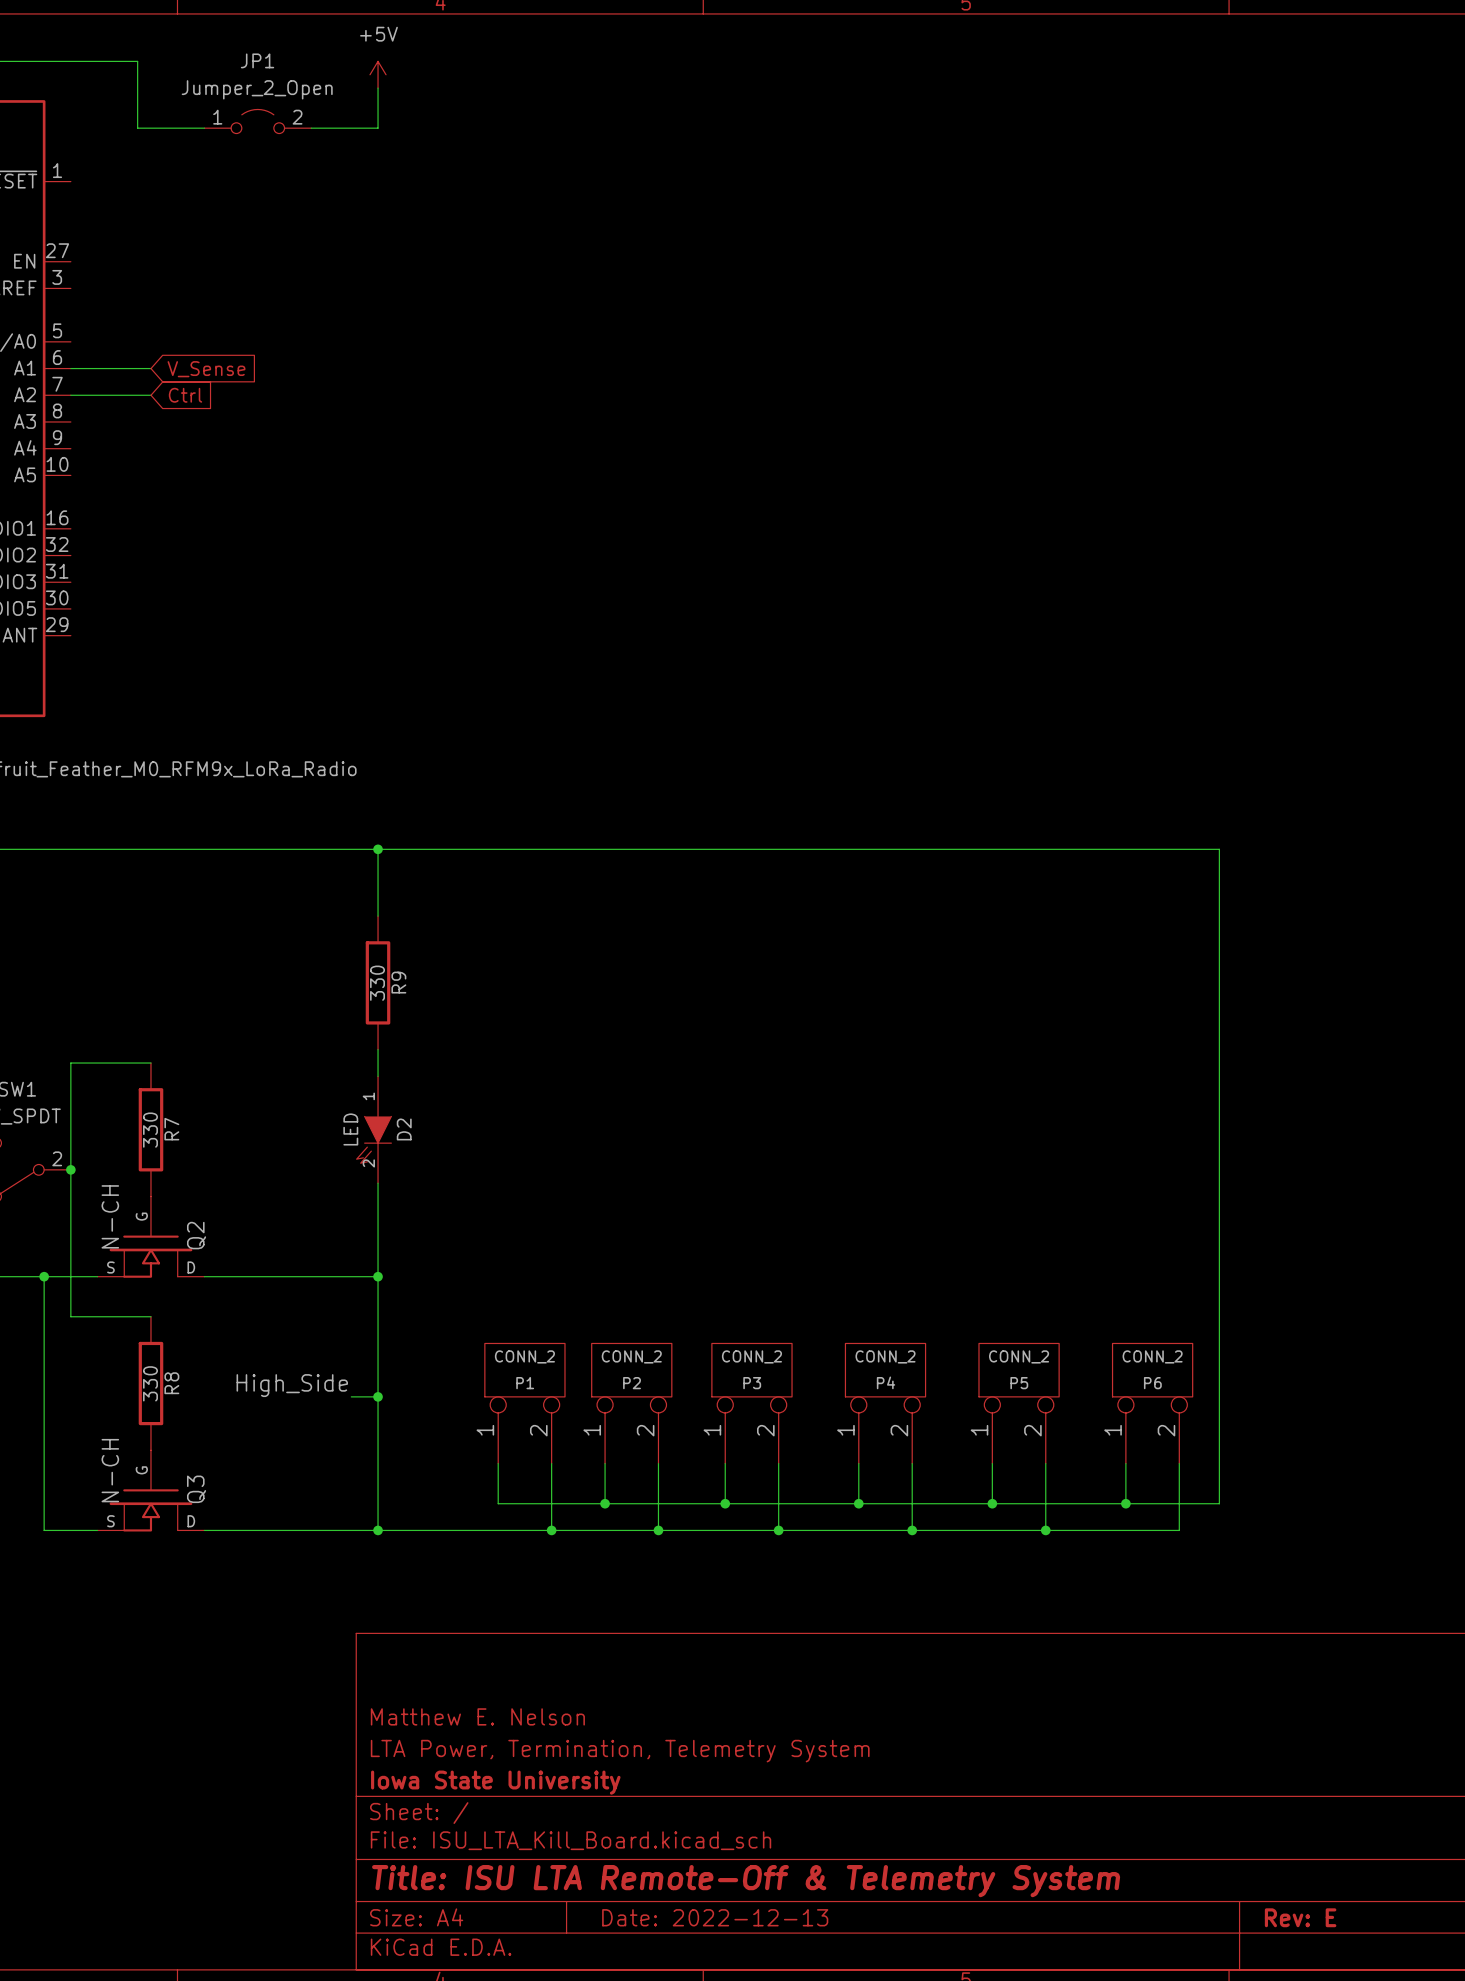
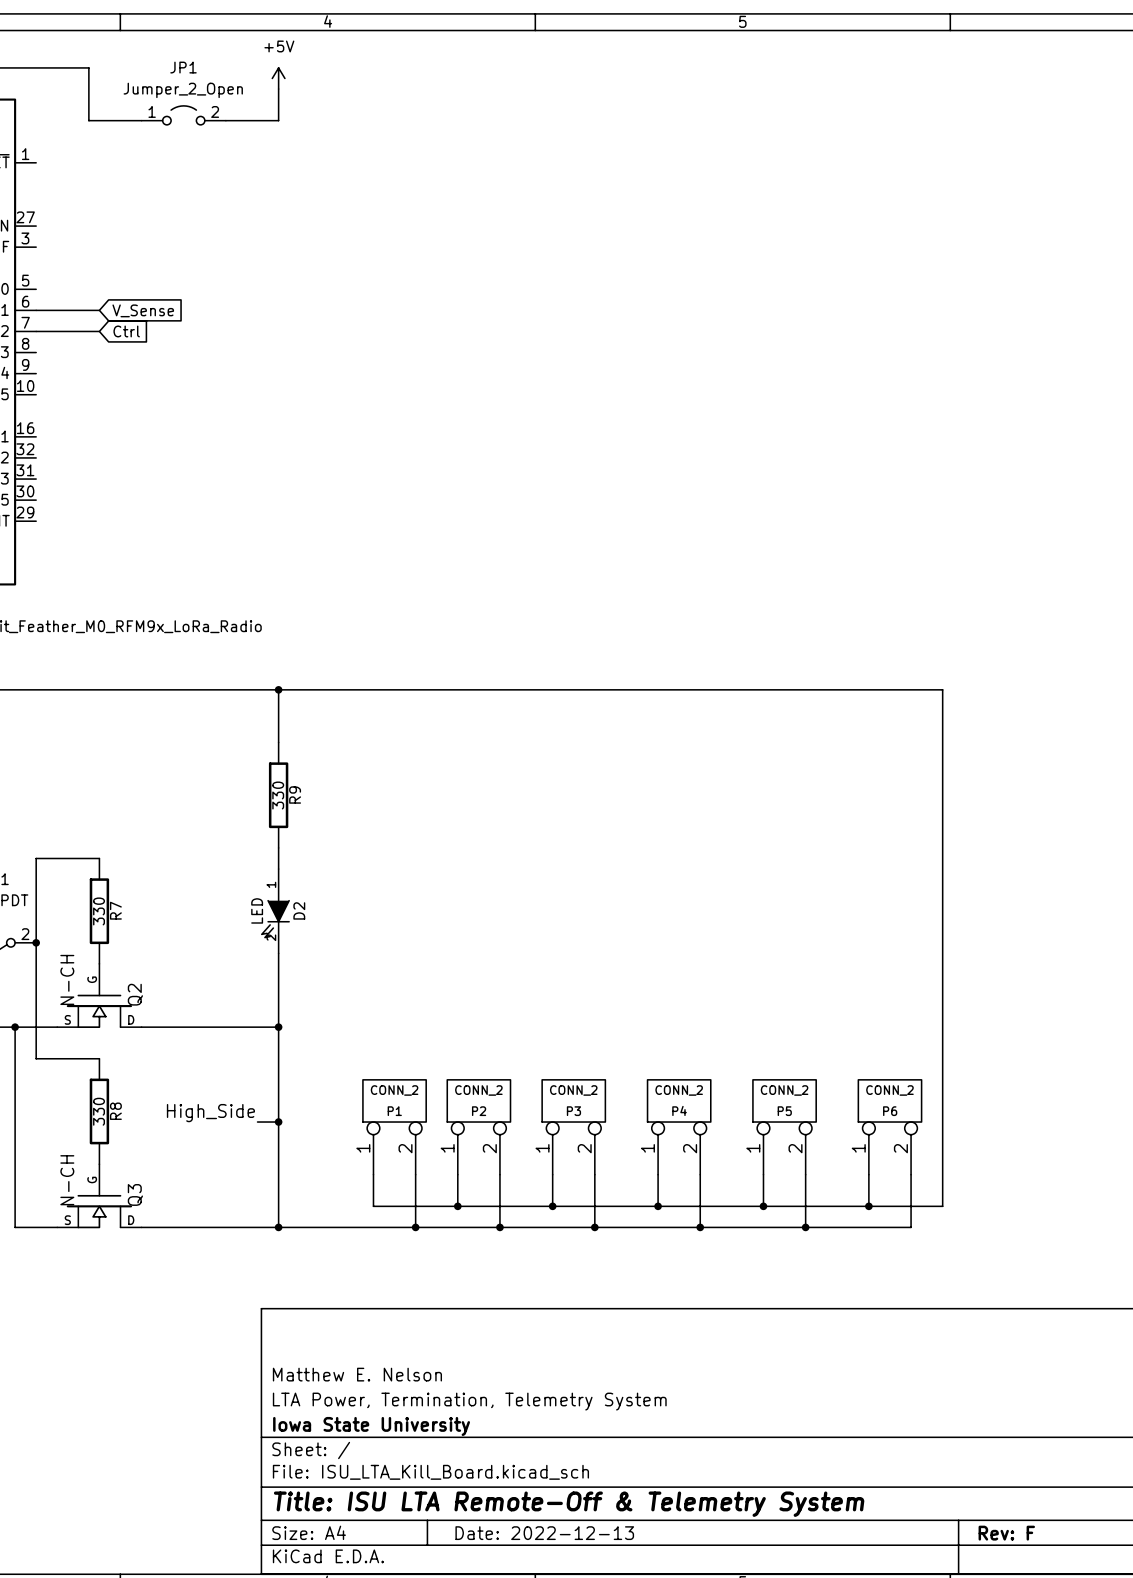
title block: Rev: E (1300, 1917) -> Rev: F (1006, 1533)

